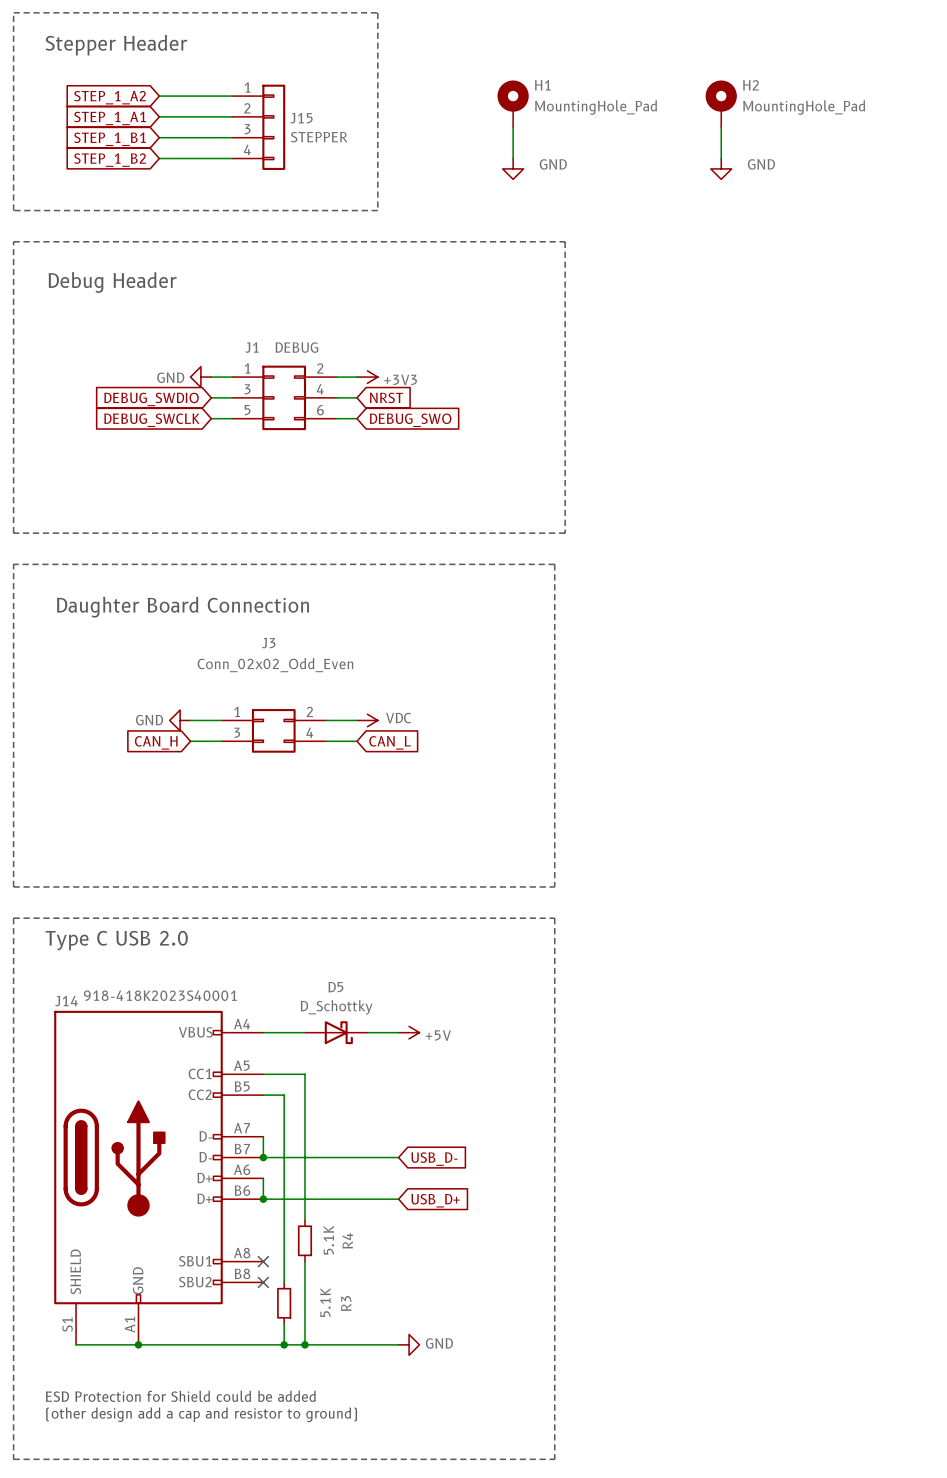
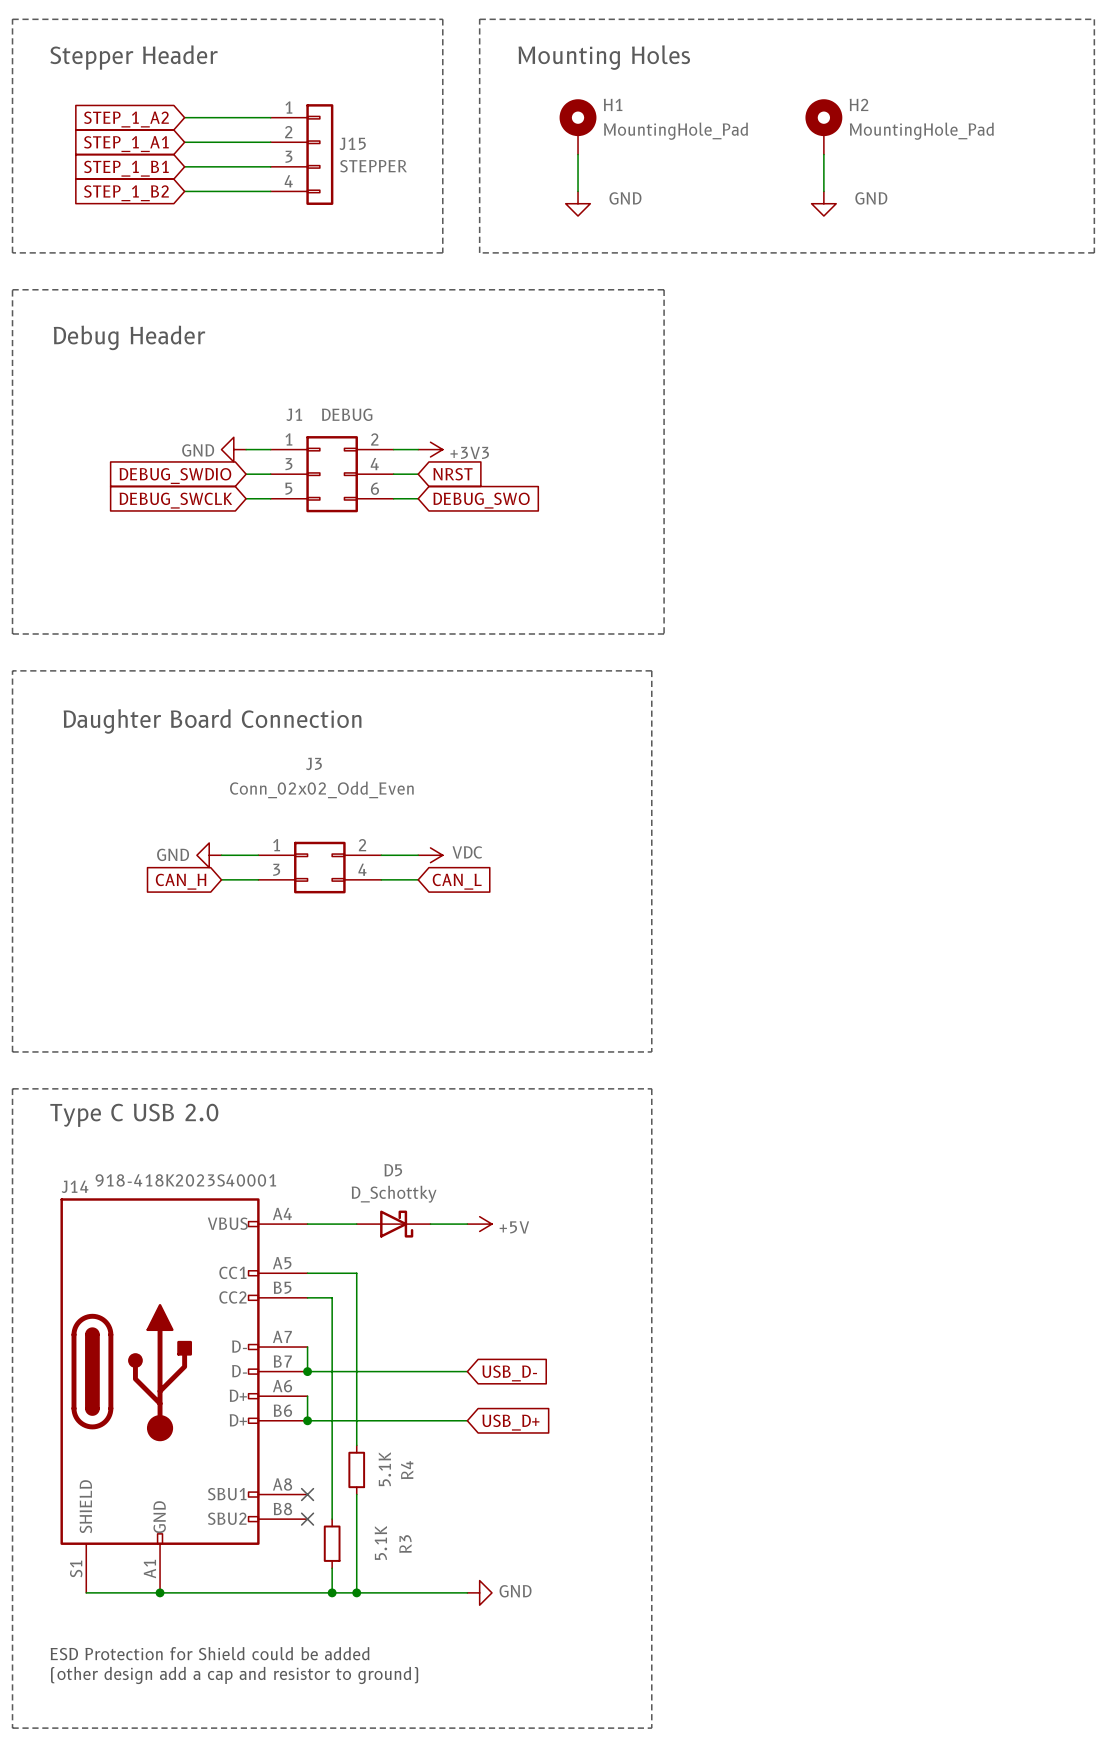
line: none -> (479, 19) (1094, 19) (1094, 252) (479, 252) (479, 19)
text: none -> Mounting Holes (604, 57)
H1 position: (513, 103) -> (578, 126)
H2 position: (721, 103) -> (823, 126)
wire: (513, 127) (513, 158) -> (578, 154) (578, 191)
wire: (721, 127) (721, 158) -> (823, 154) (823, 191)
power symbol position: GND (513, 168) -> GND (578, 203)
power symbol position: GND (721, 168) -> GND (823, 203)

